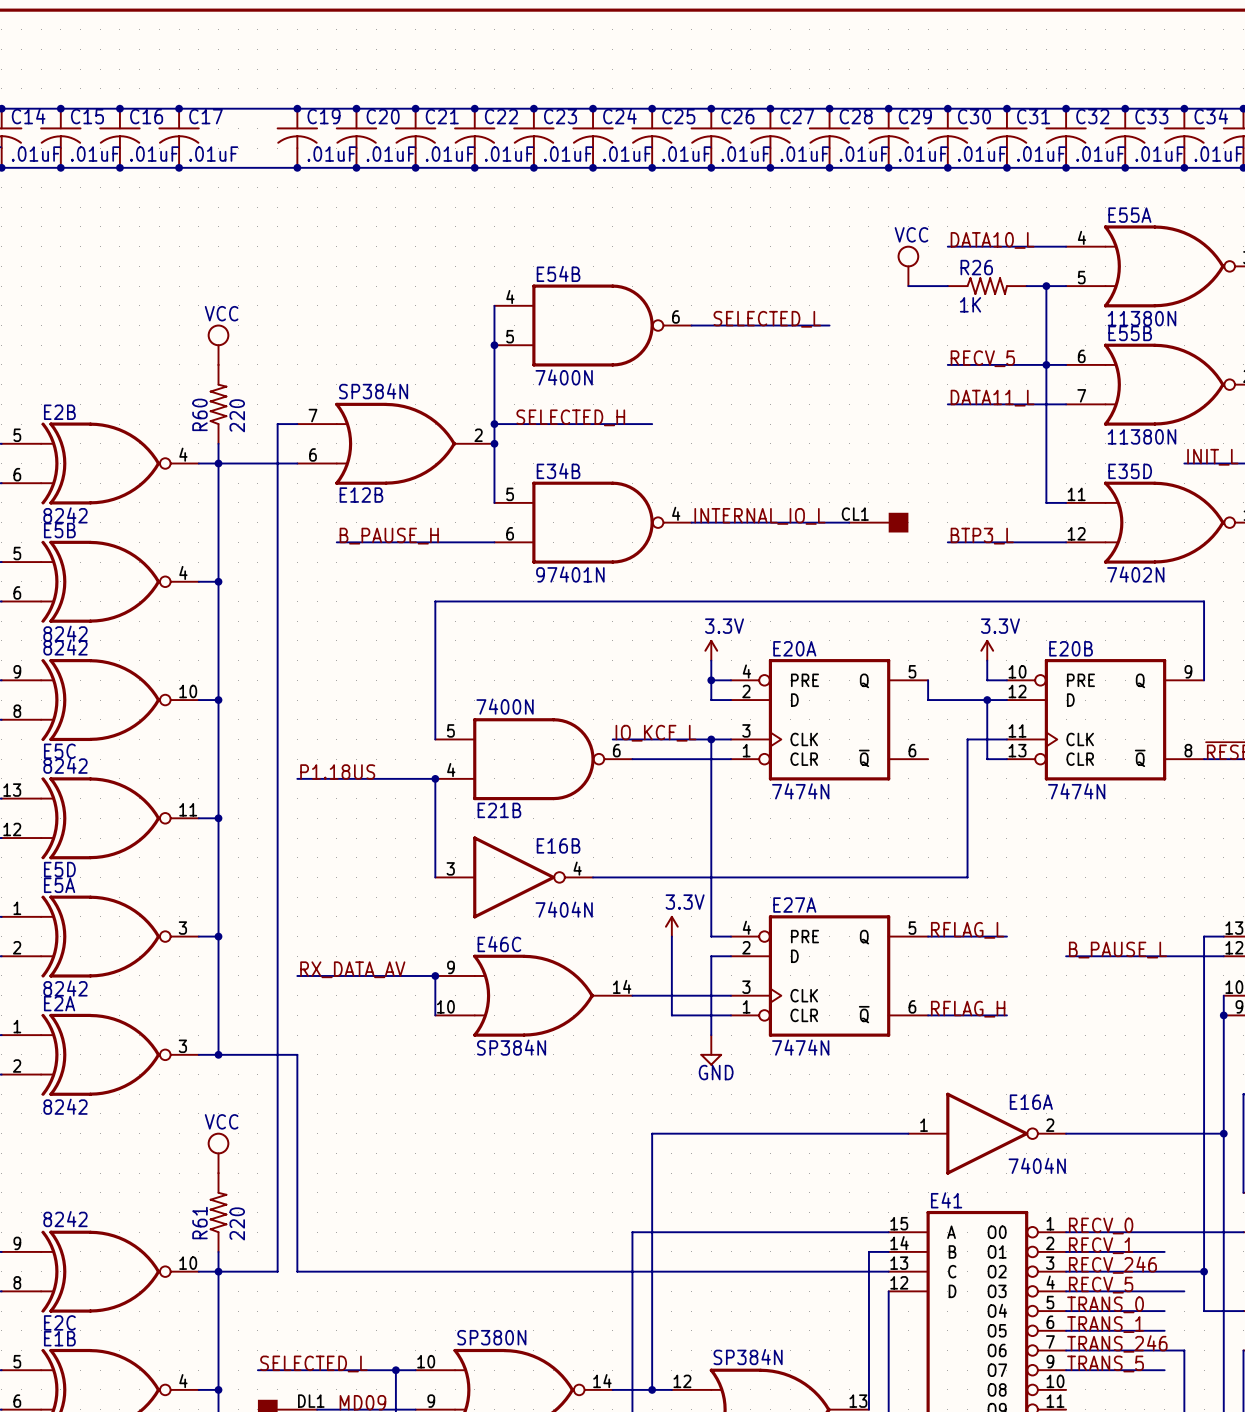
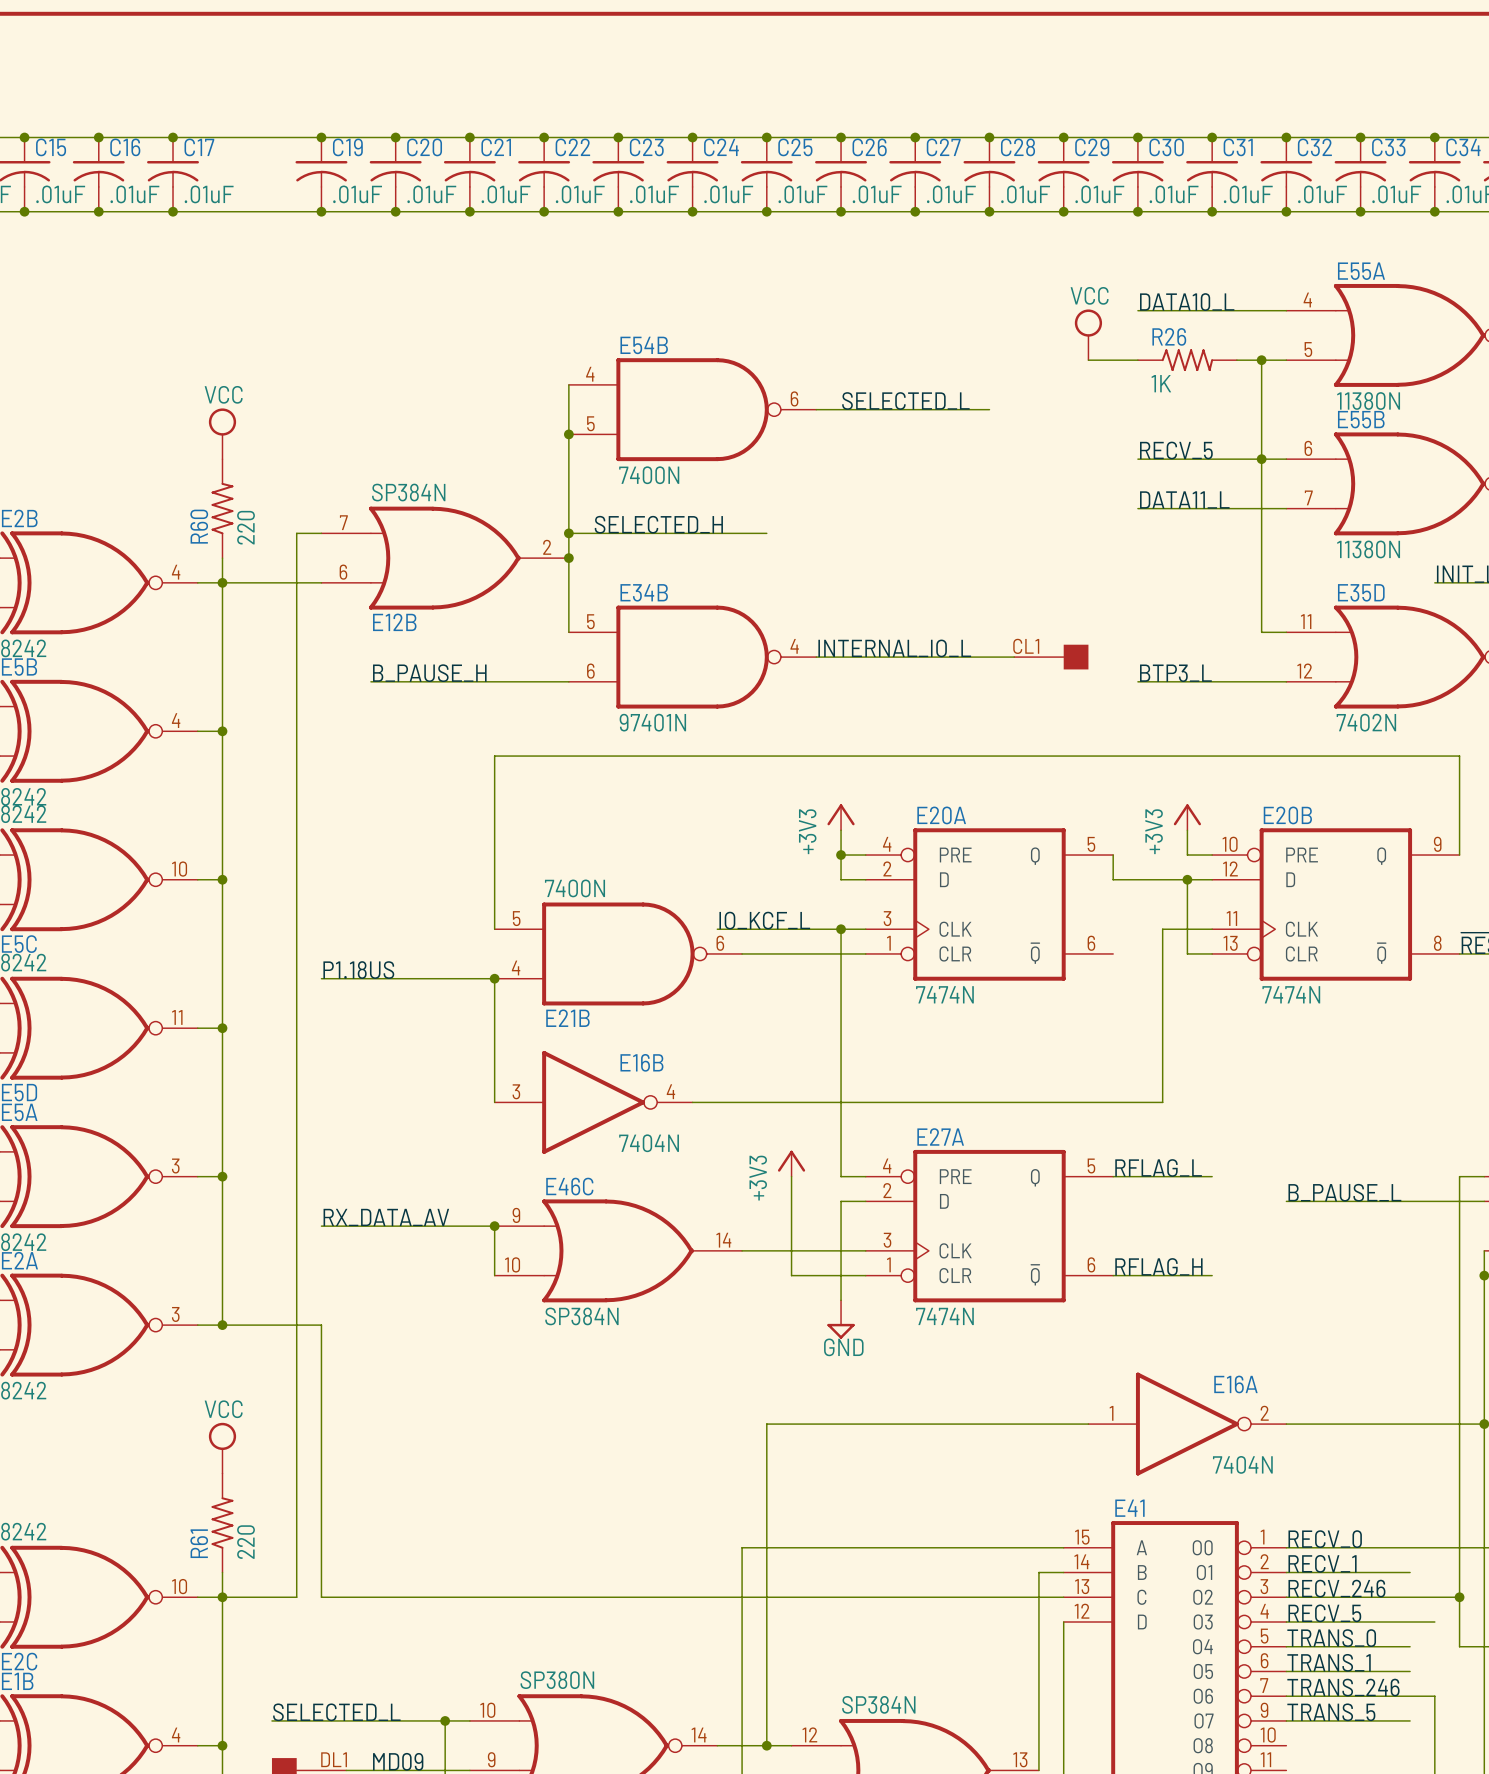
power symbol: 3.3V (711, 650) -> +3V3 (841, 817)
power symbol: 3.3V (987, 650) -> +3V3 (1187, 817)
power symbol: 3.3V (671, 926) -> +3V3 (791, 1163)

